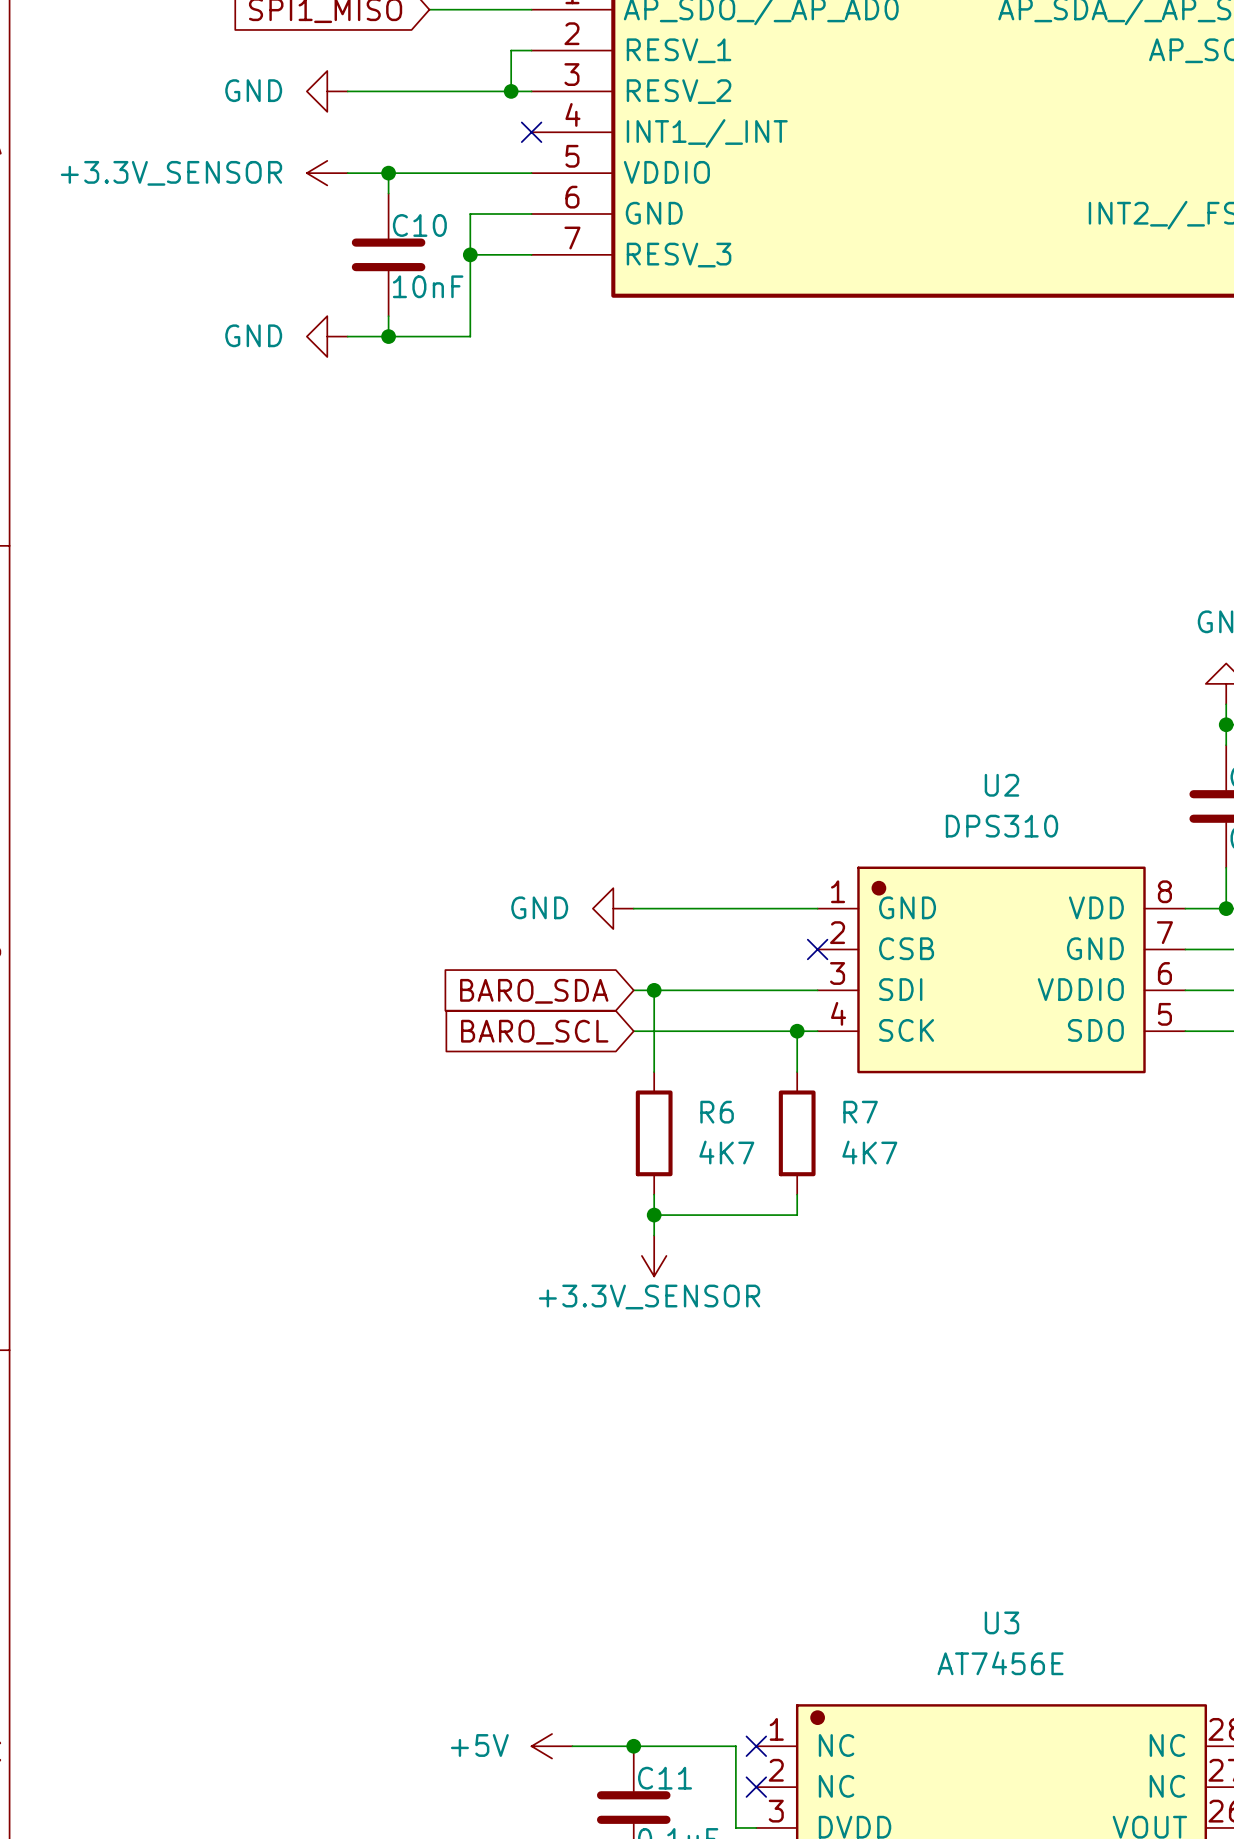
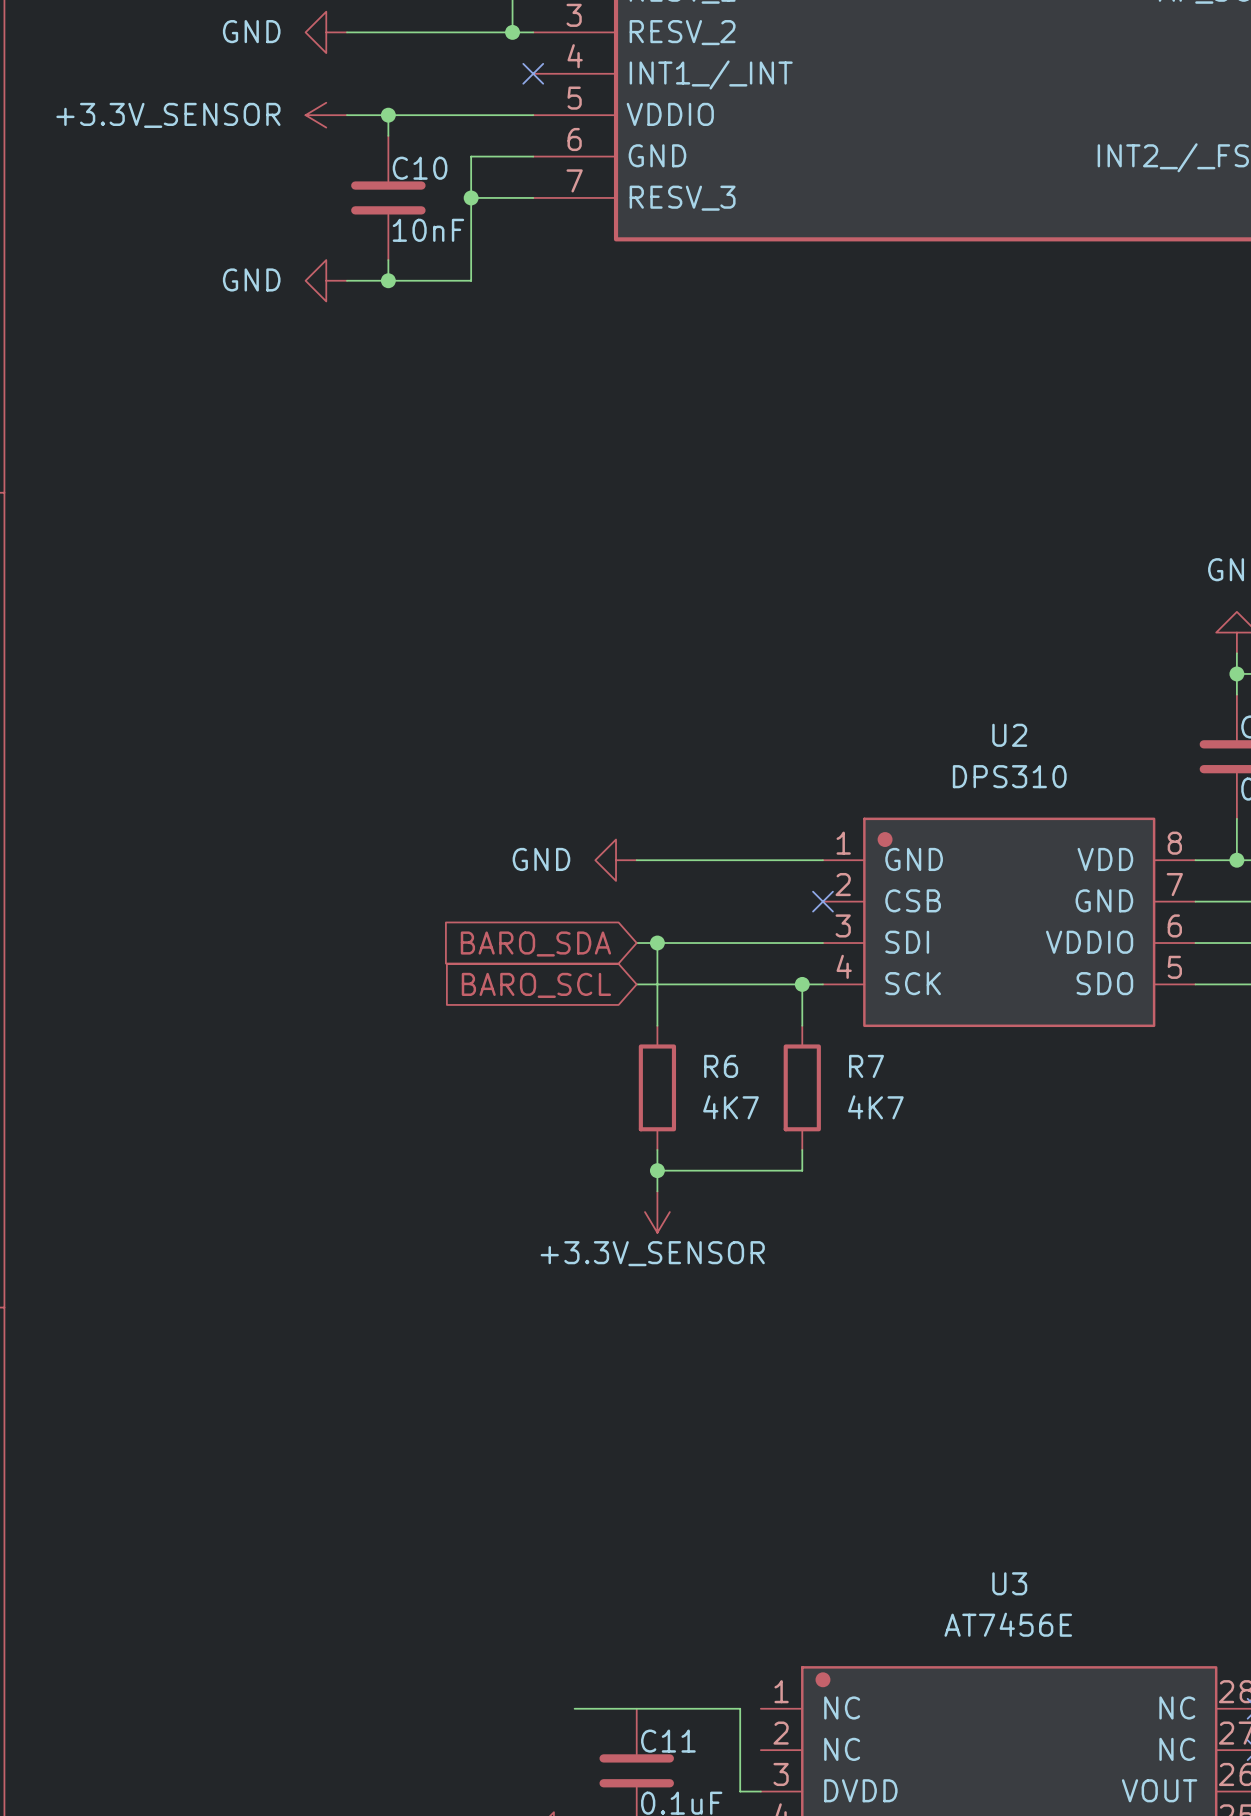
power symbol: +5V (552, 1746) -> none
junction: (633, 1746) -> none
no-connect mark: (756, 1746) -> none
no-connect mark: (756, 1787) -> none

